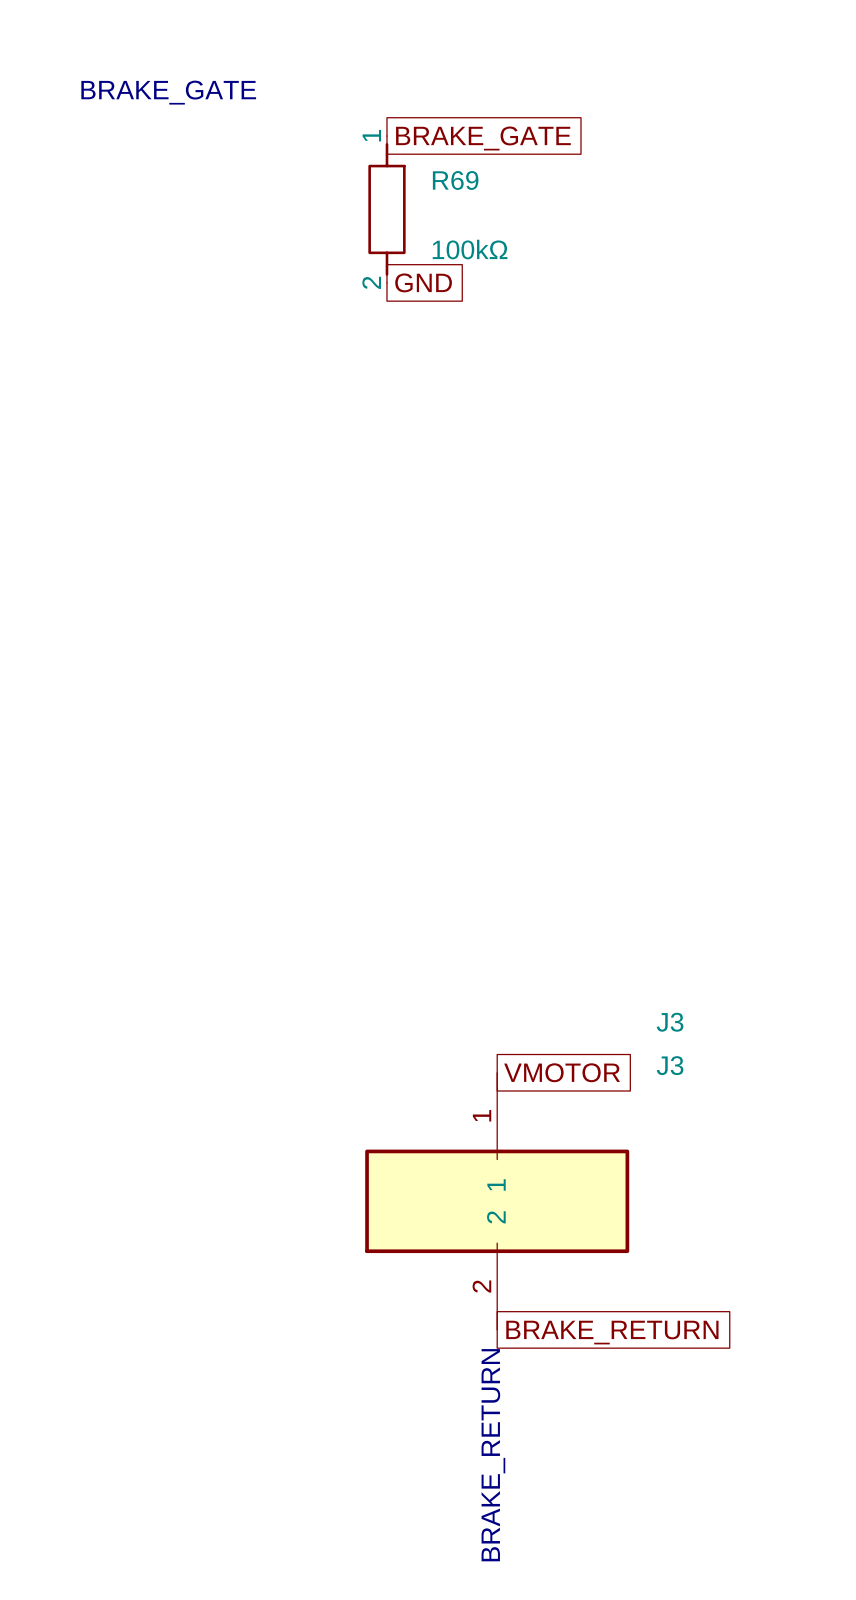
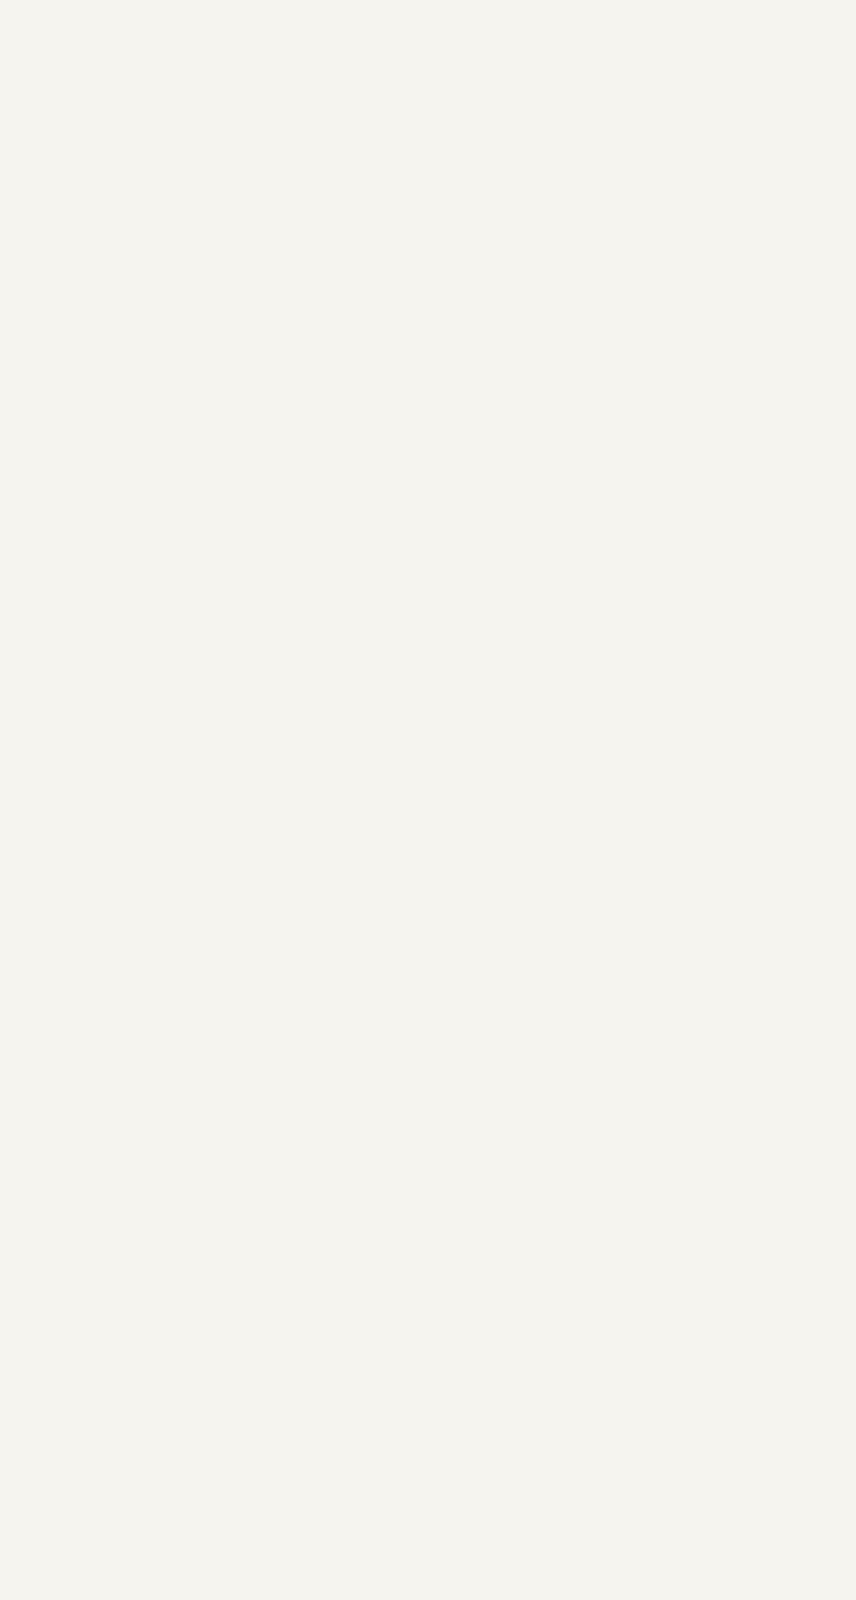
text: BRAKE_GATE (168, 92) -> none
global label: BRAKE_GATE (483, 138) -> none
R69: 100kΩ (386, 209) -> none
global label: GND (423, 282) -> none
global label: VMOTOR (562, 1072) -> none
J3: J3 (497, 1201) -> none
global label: BRAKE_RETURN (612, 1332) -> none
text: BRAKE_RETURN (493, 1455) -> none

